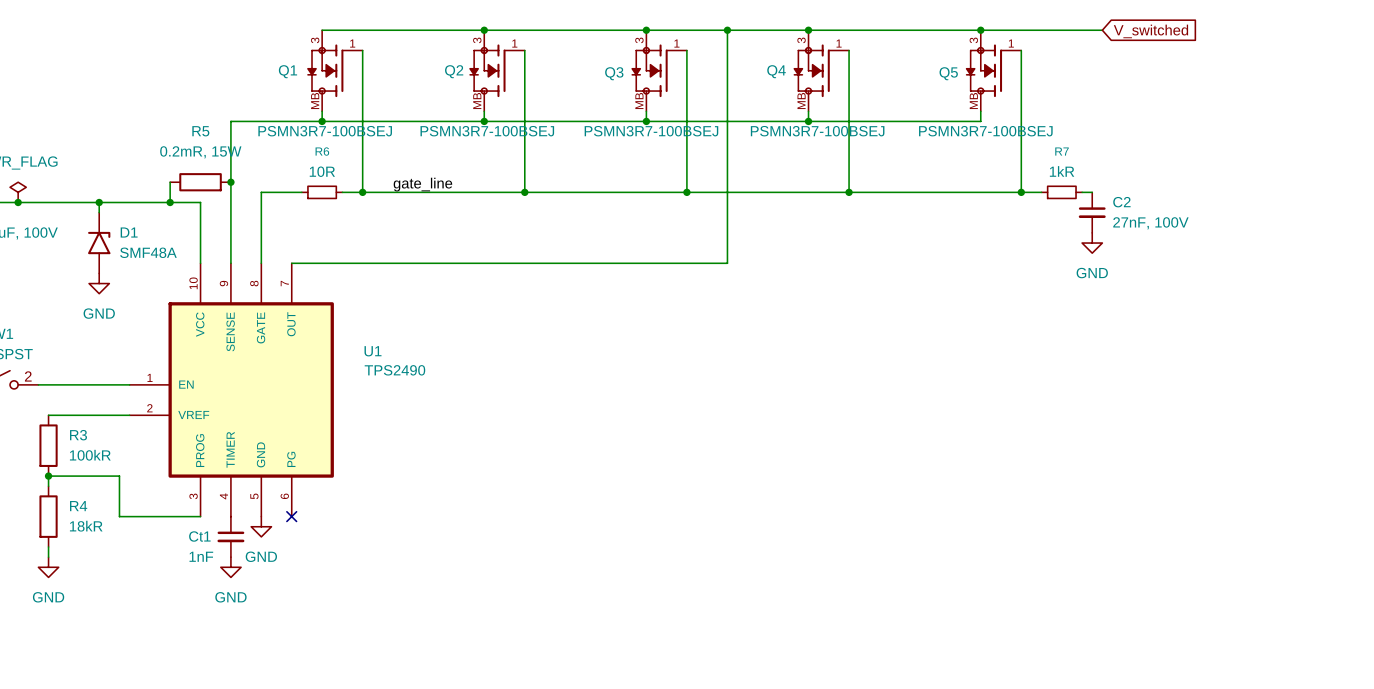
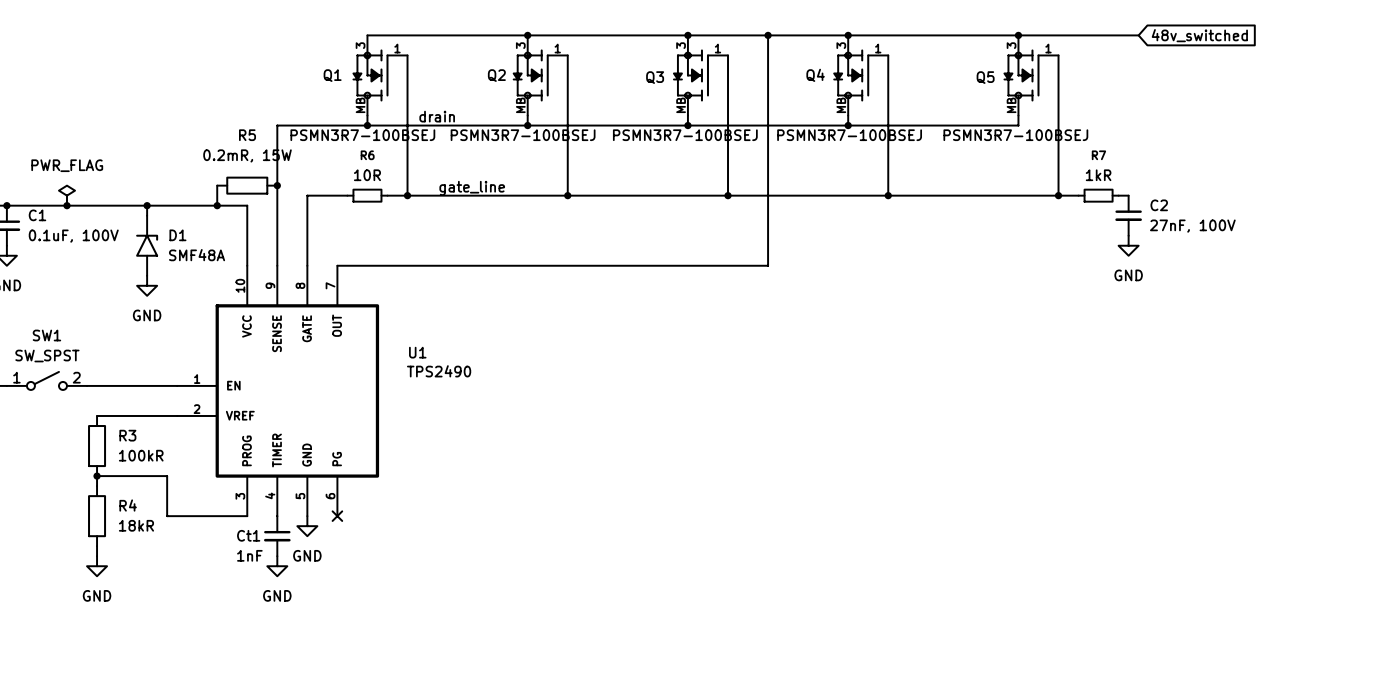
global label: V_switched (1150, 31) -> 48v_switched (1199, 35)
label: none -> drain (437, 116)

